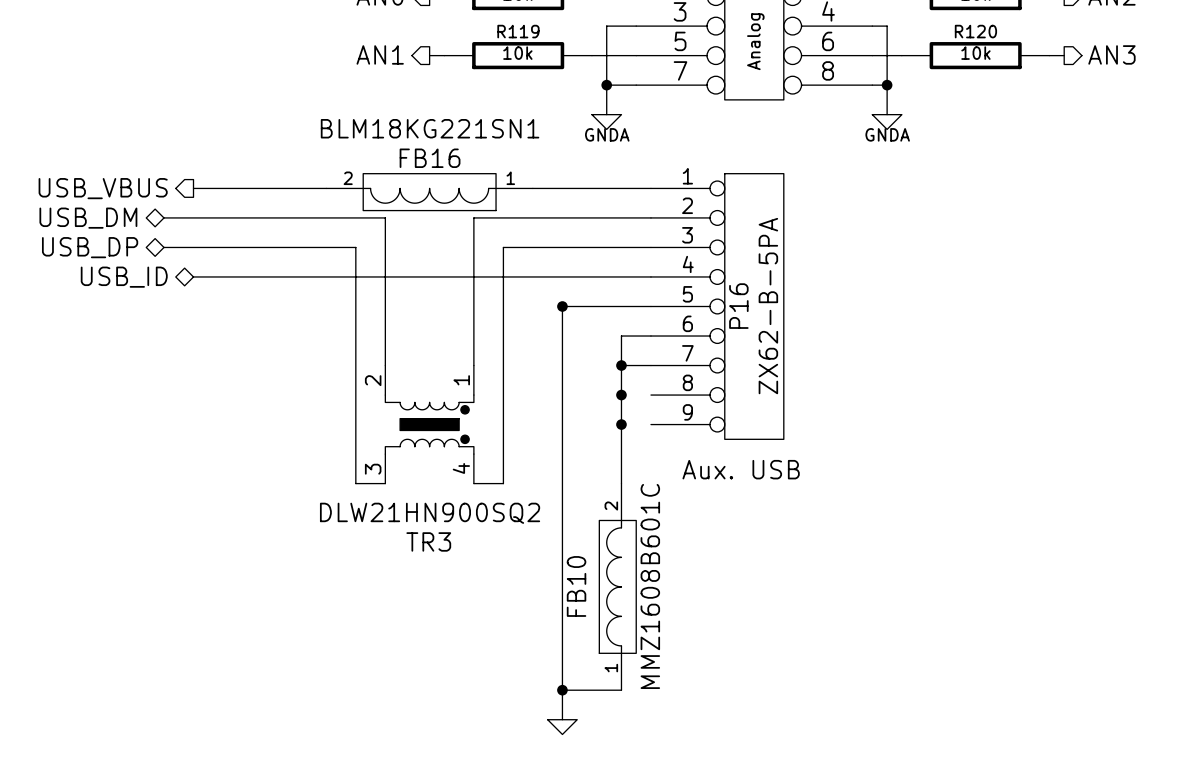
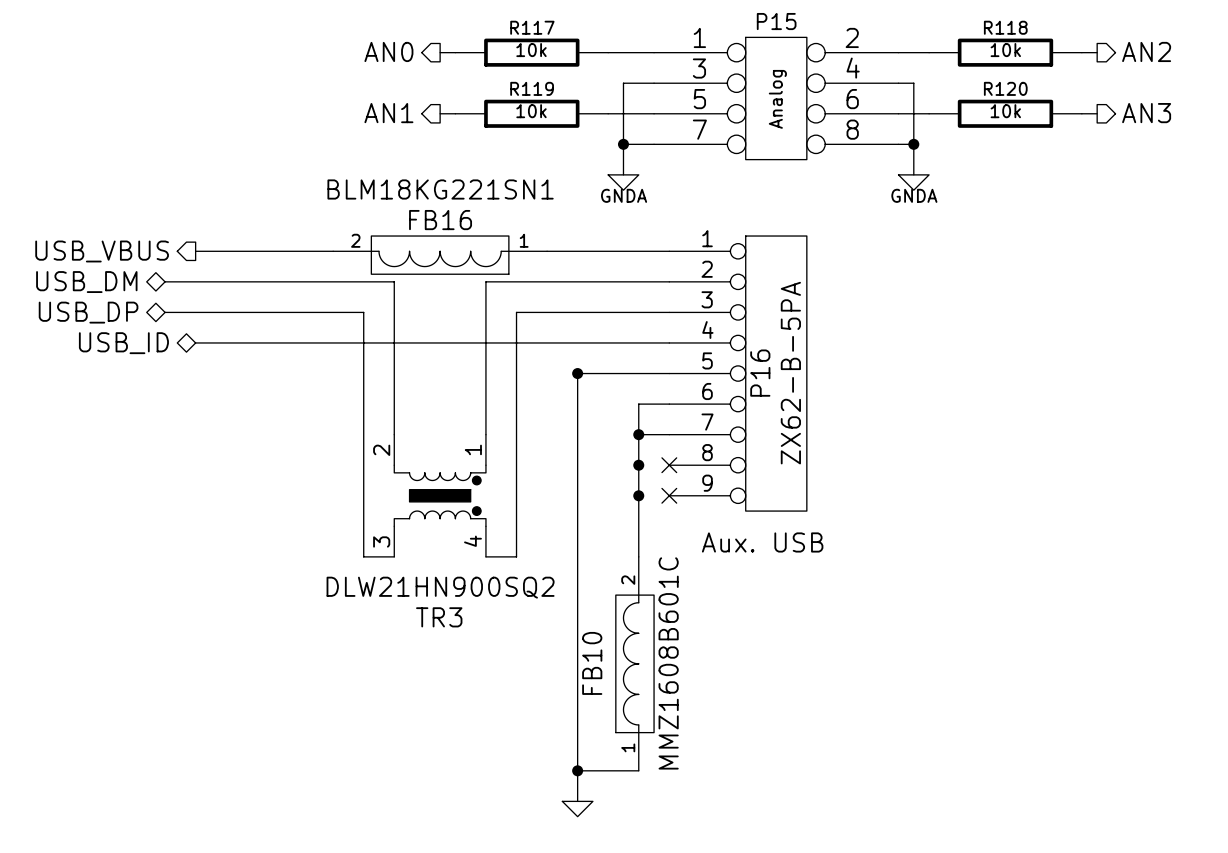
no-connect mark: none -> (669, 465)
no-connect mark: none -> (669, 495)

